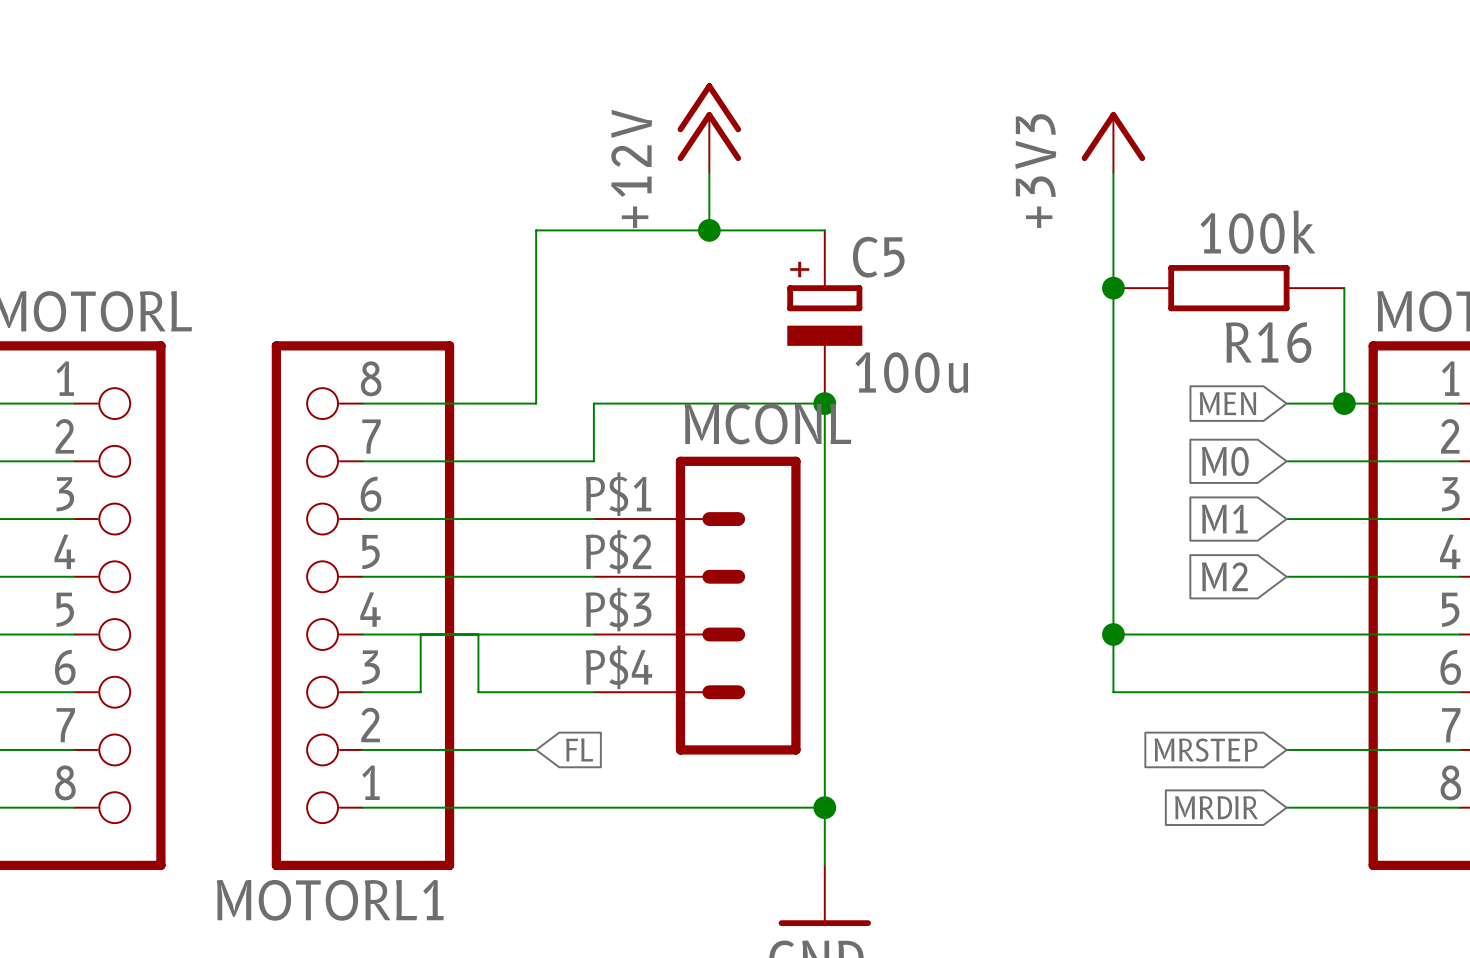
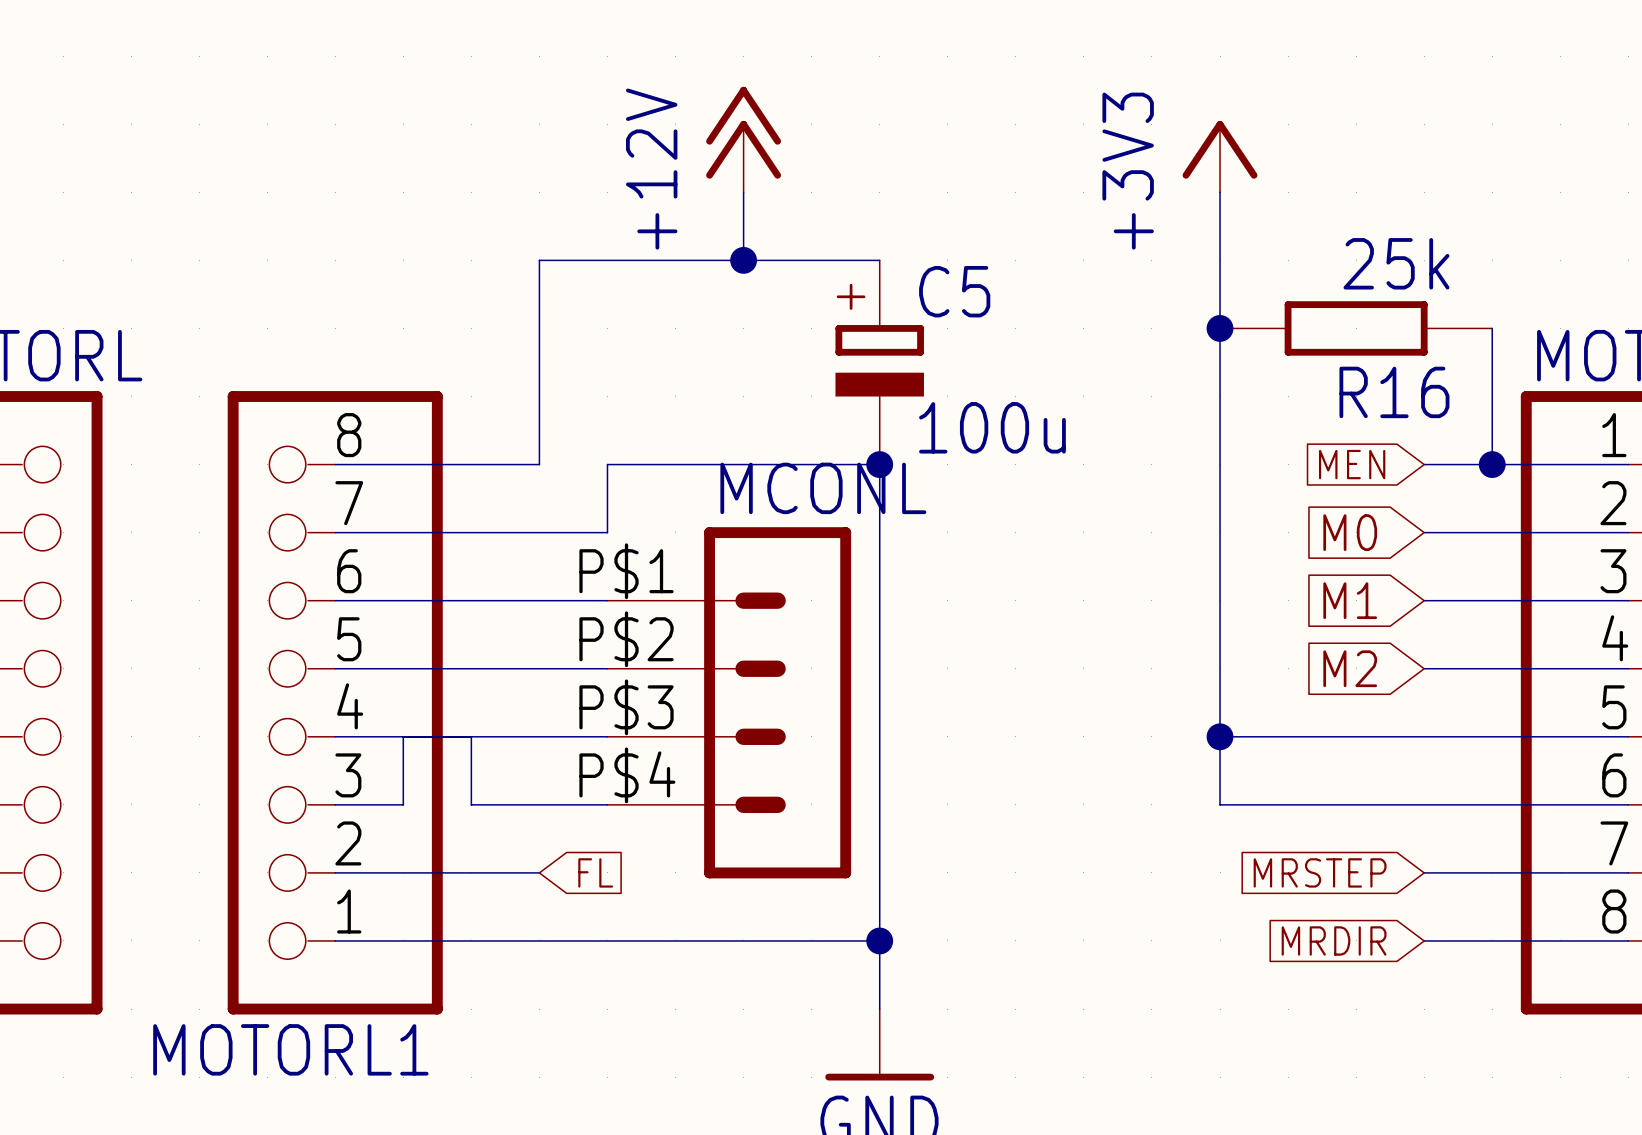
R16 value: 100k (1258, 232) -> 25k (1396, 263)

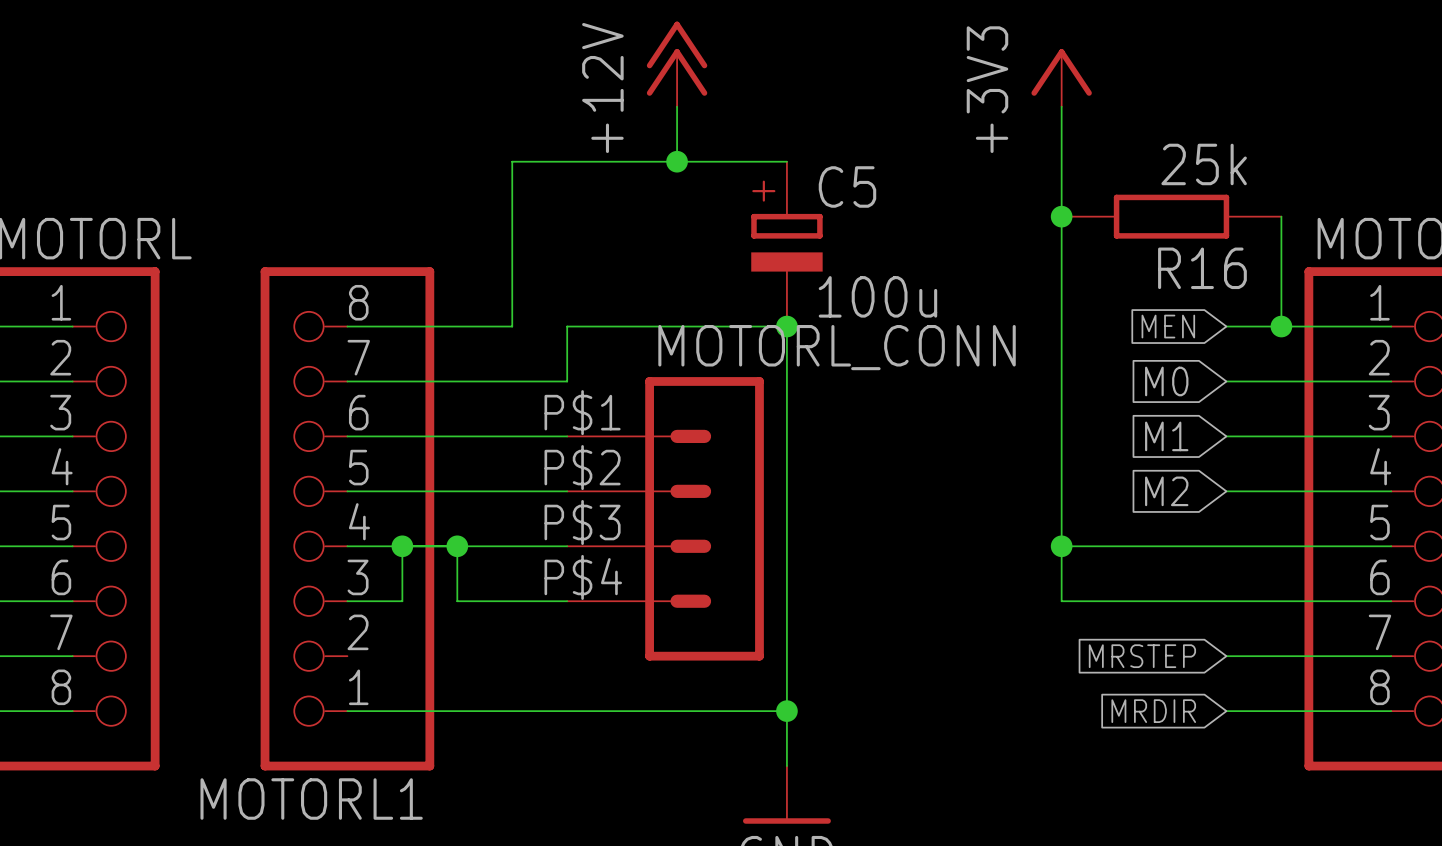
MCONL name: MCONL (823, 488) -> MOTORL_CONN (837, 347)
junction: none -> (402, 546)
junction: none -> (457, 546)
wire: (335, 872) (539, 872) -> none
global label: FL (595, 872) -> none

